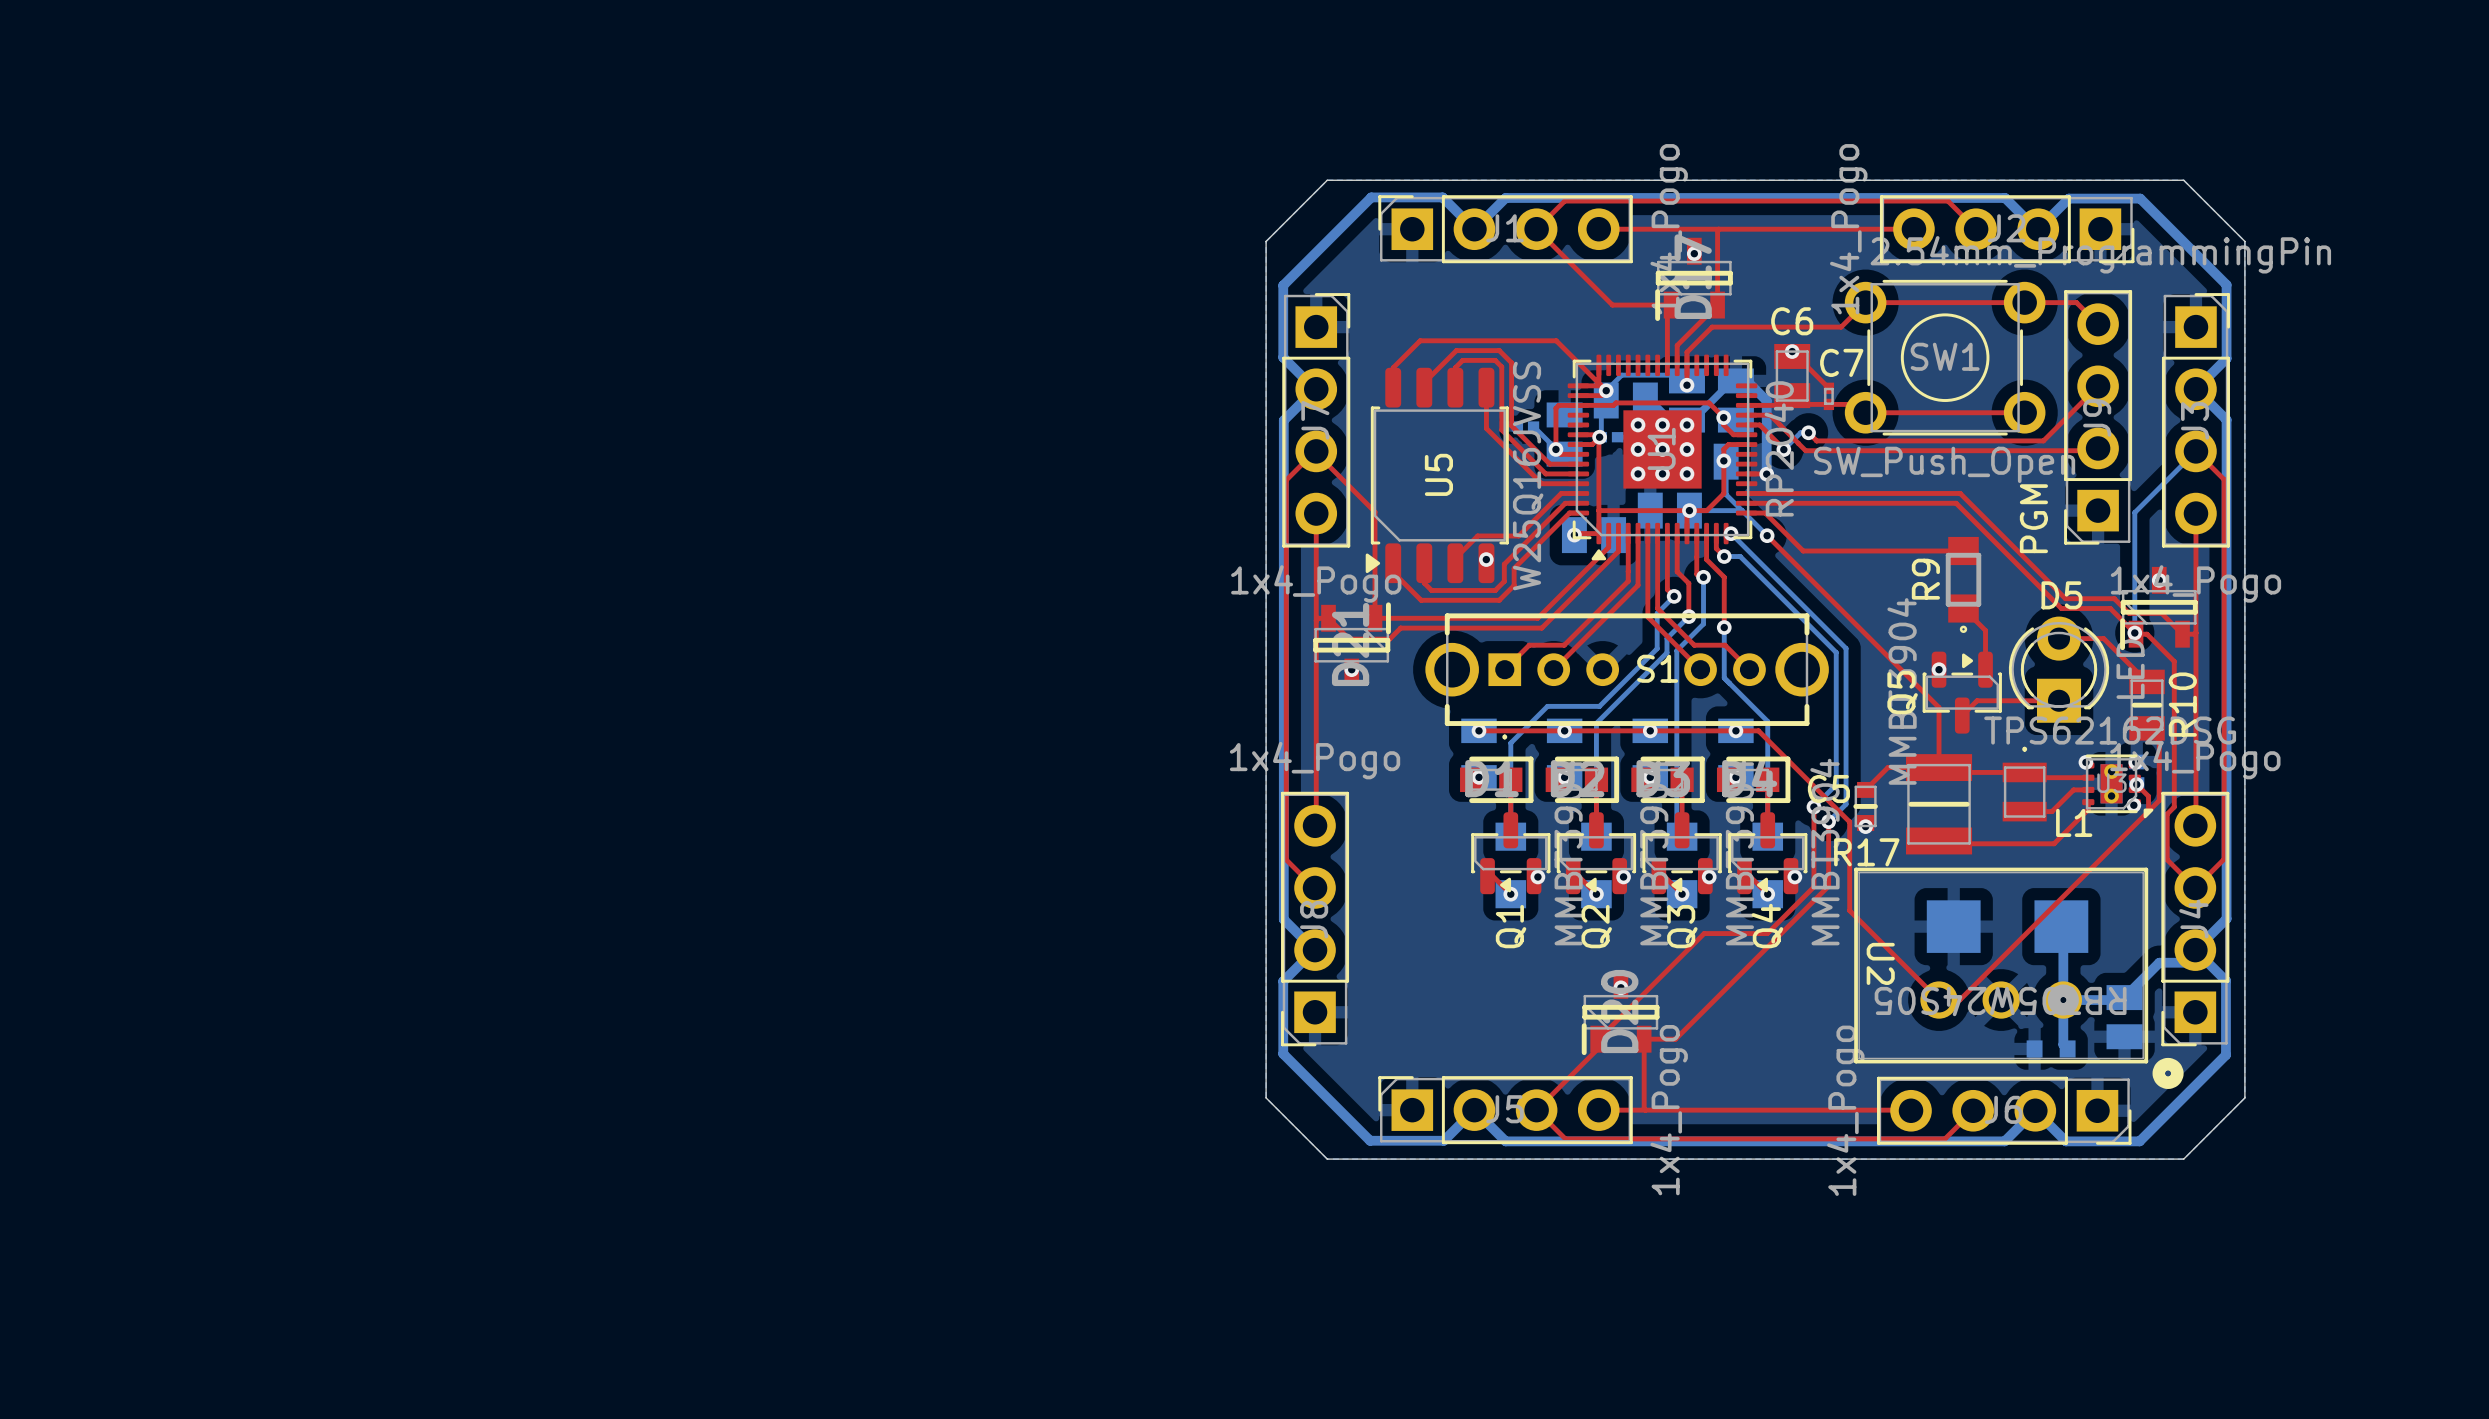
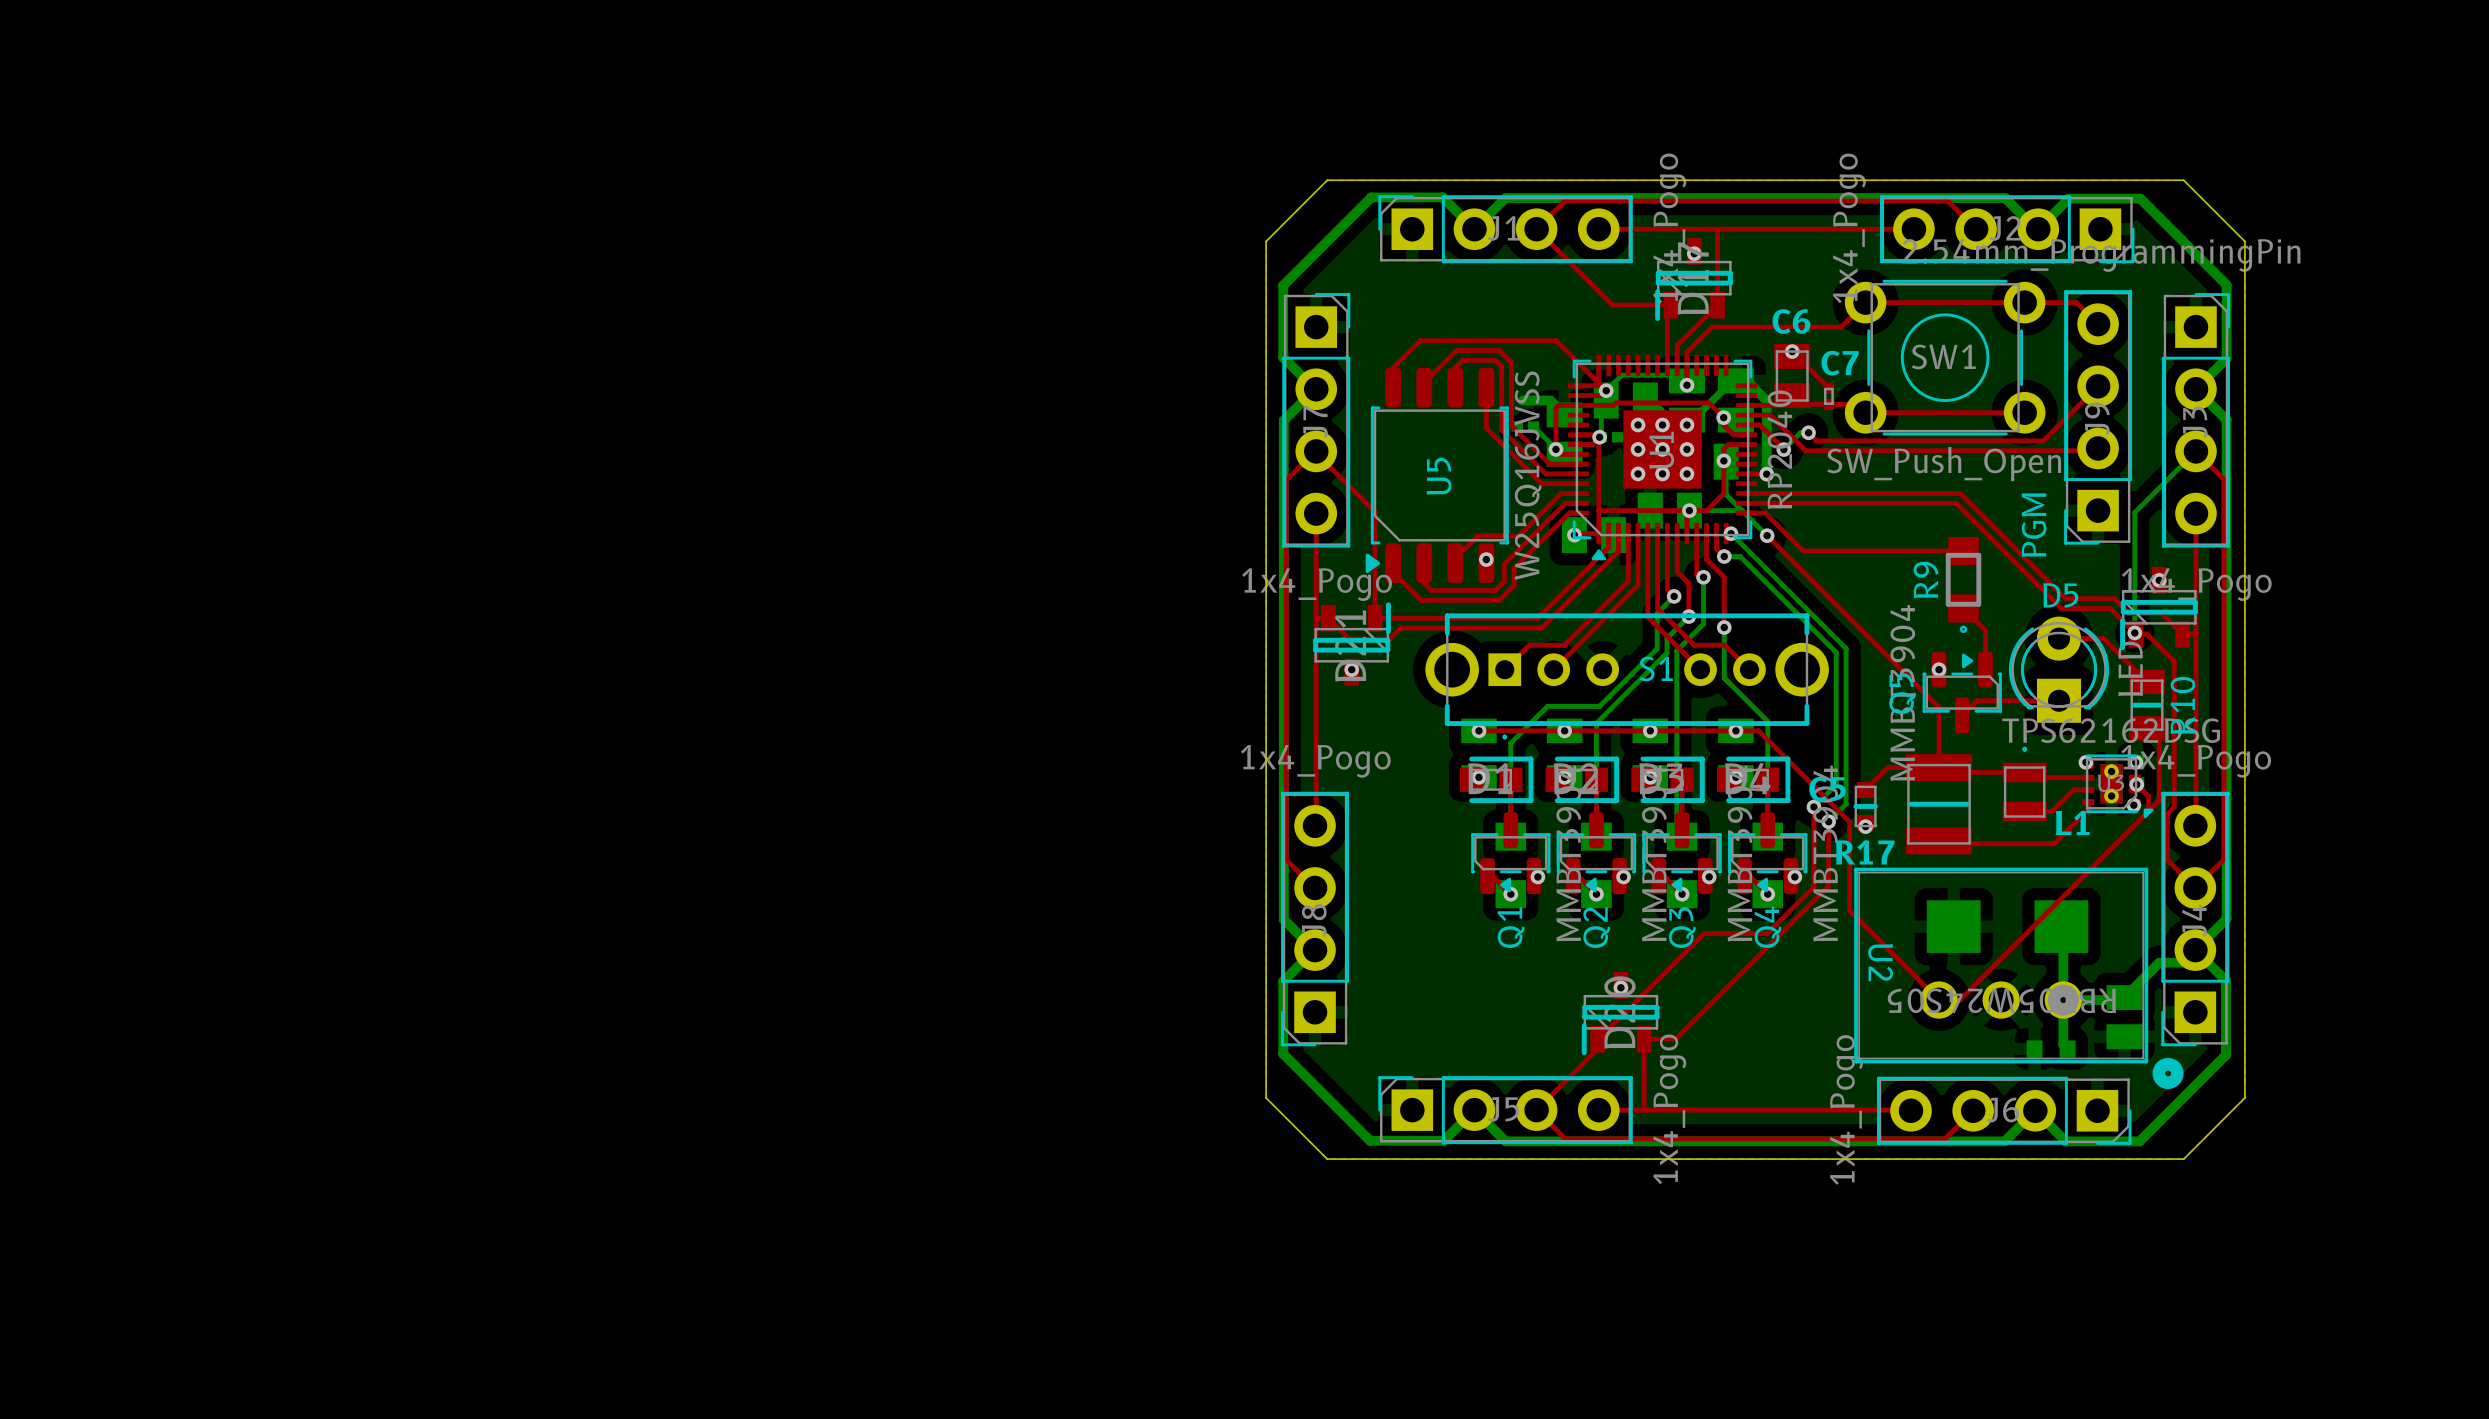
bottom track: none -> (1523, 400) (1550, 400) (1564, 414)

